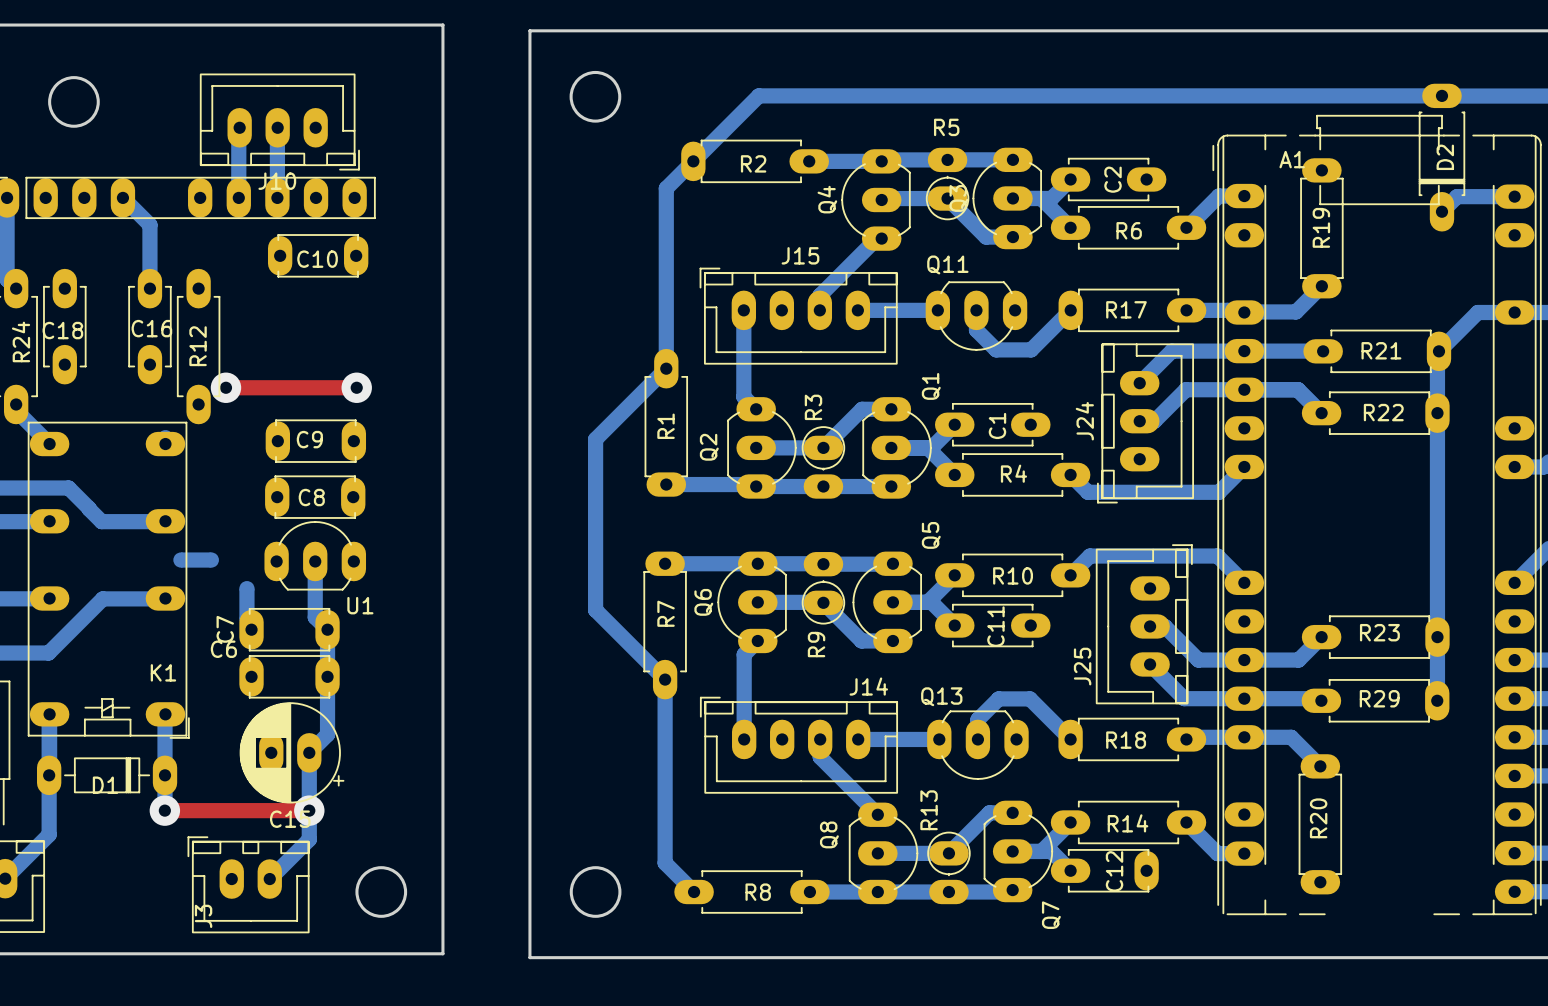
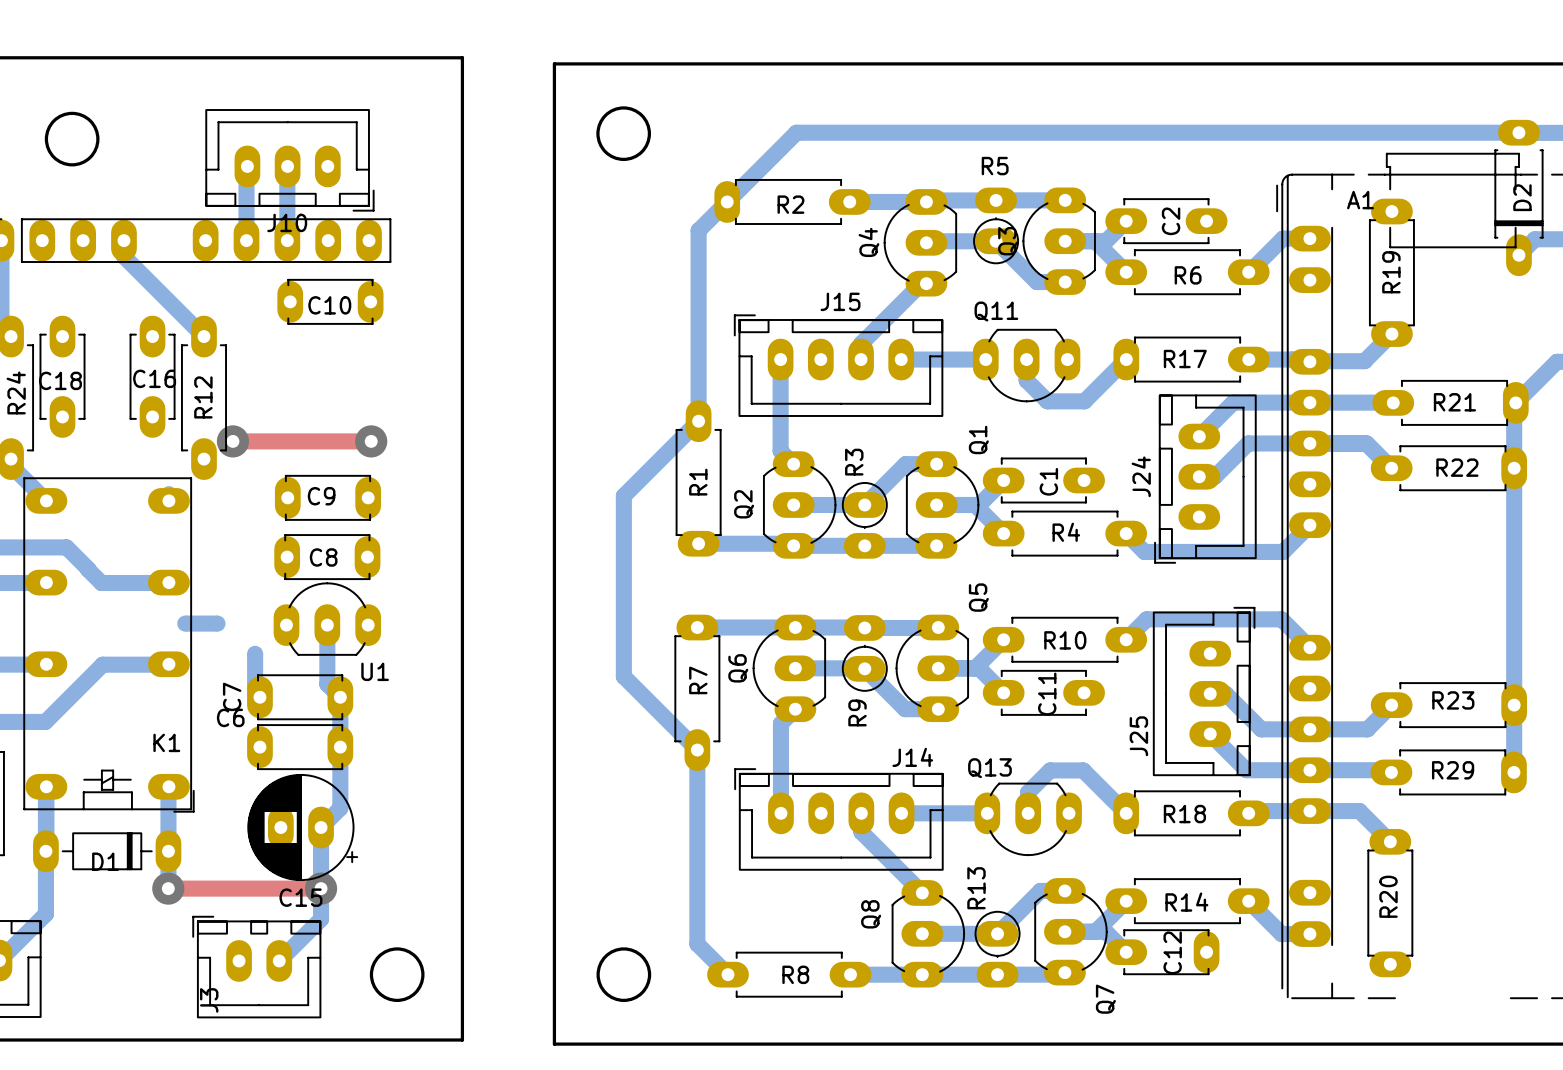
bottom track: (122, 197) (149, 224) (149, 288) -> (123, 240) (123, 256) (204, 336)

